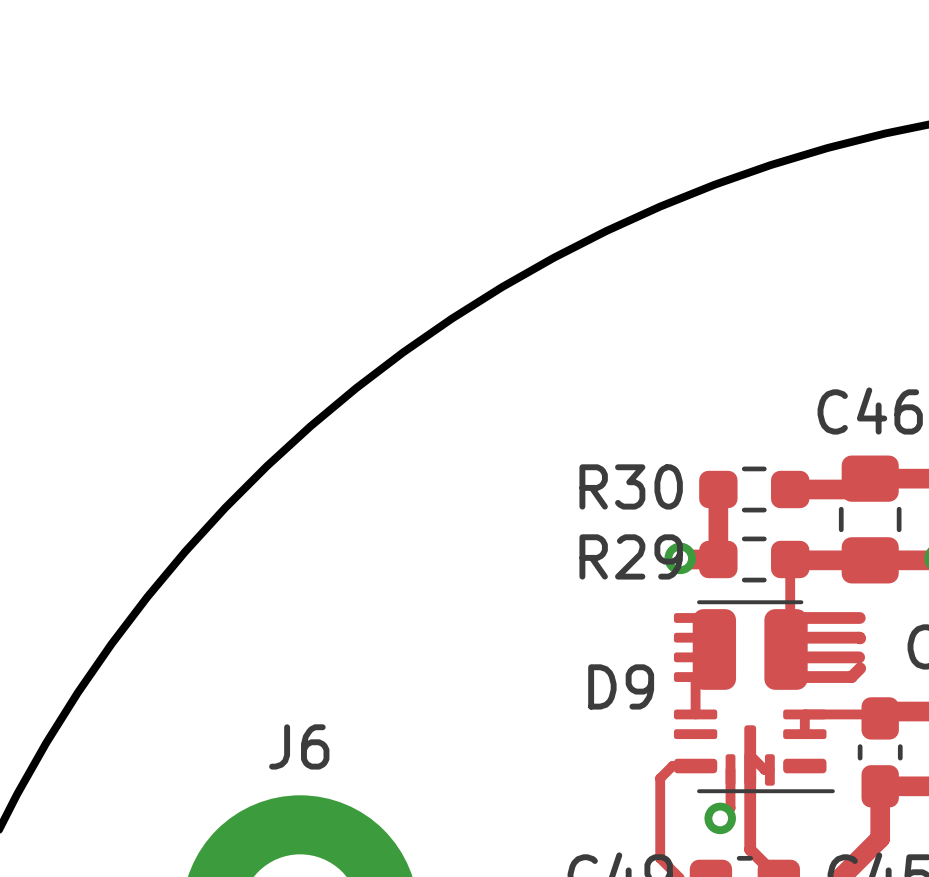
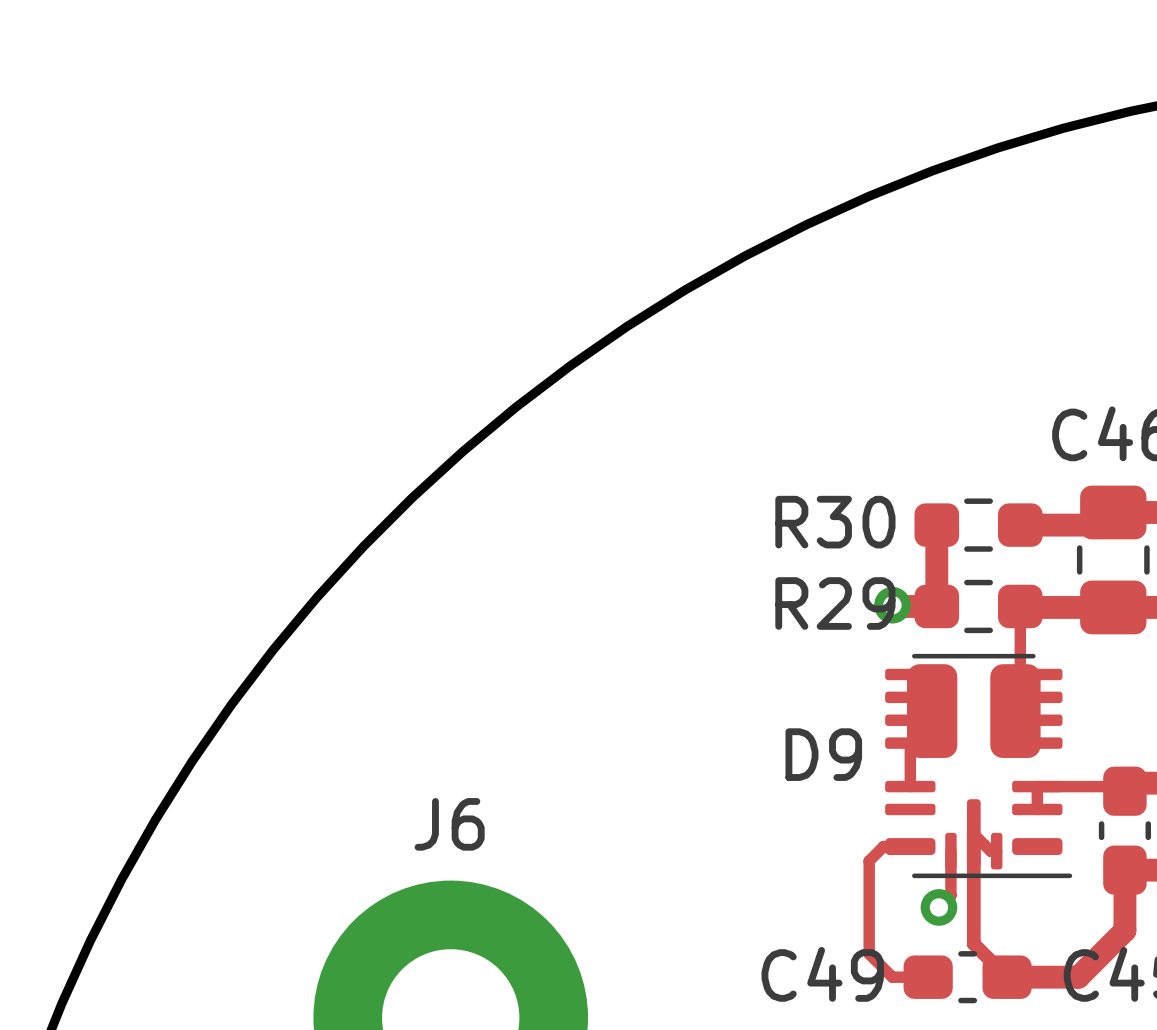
track: (804, 617) (859, 617) -> none
track: (804, 637) (860, 638) -> none
track: (804, 657) (859, 657) -> none
track: (860, 668) (851, 677) (804, 677) -> none

